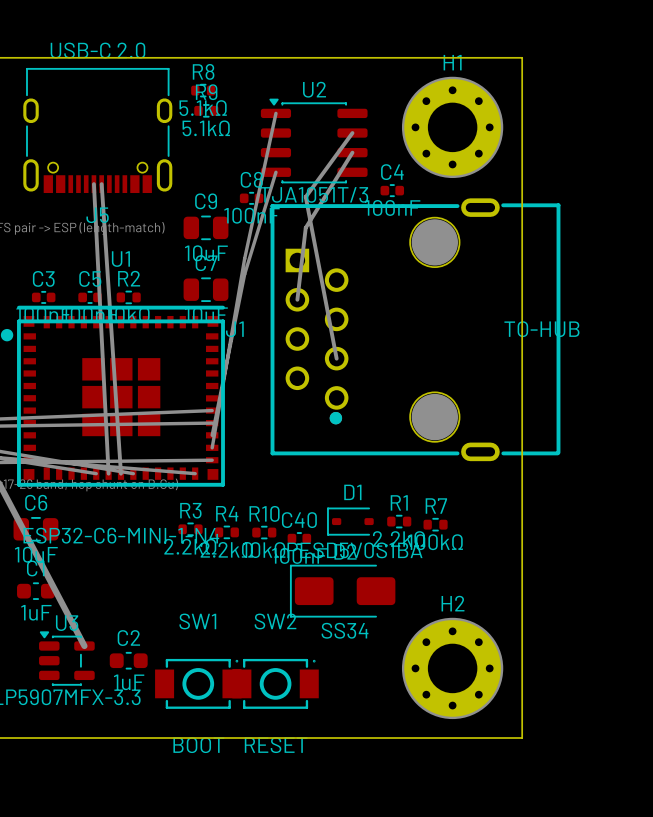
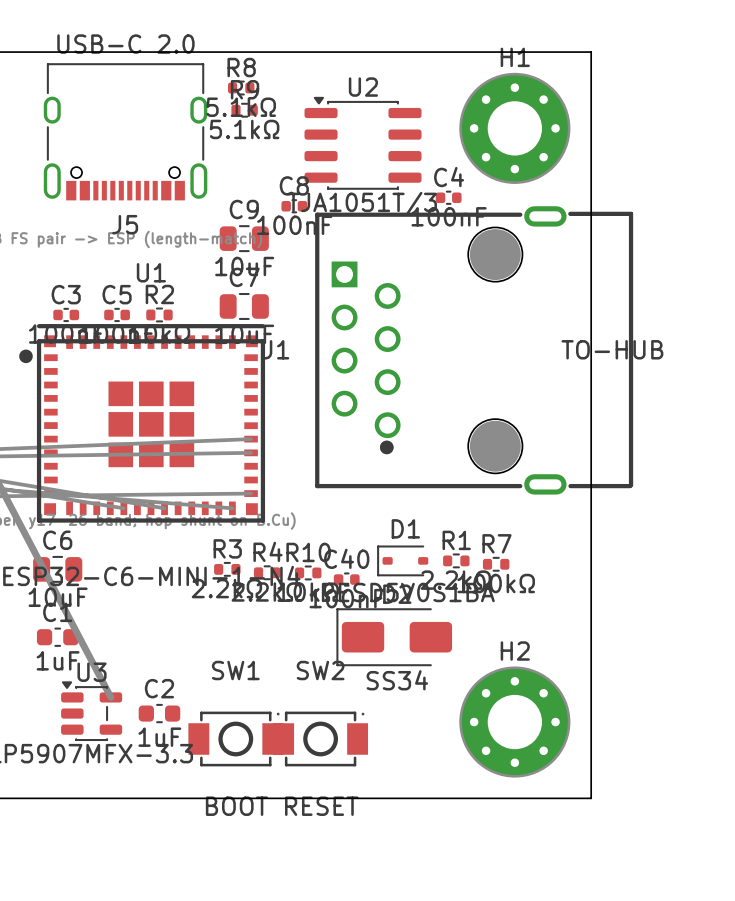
line: (275, 113) (244, 258) (212, 447) -> none
line: (352, 133) (305, 196) (336, 358) -> none
line: (352, 152) (305, 227) (297, 299) -> none
line: (275, 172) (244, 274) (212, 435) -> none
line: (93, 184) (108, 473) -> none
line: (101, 184) (120, 473) -> none

